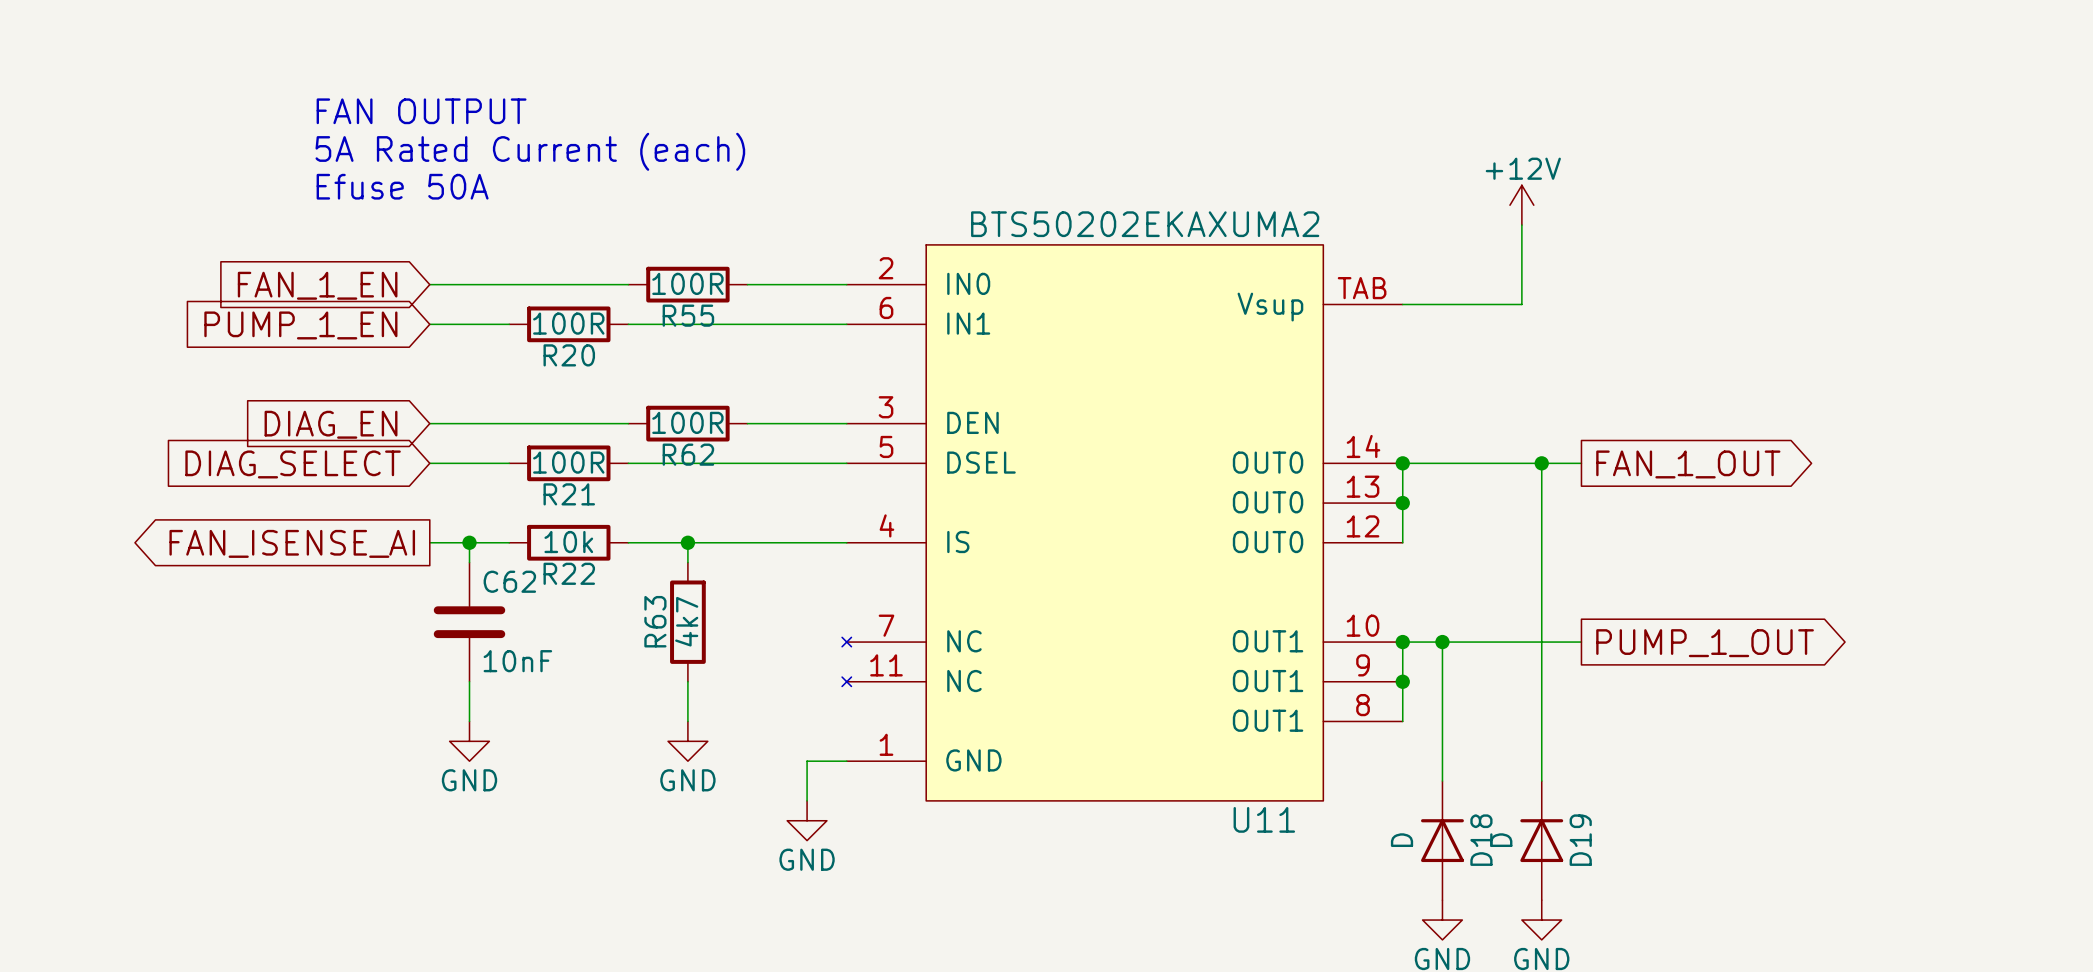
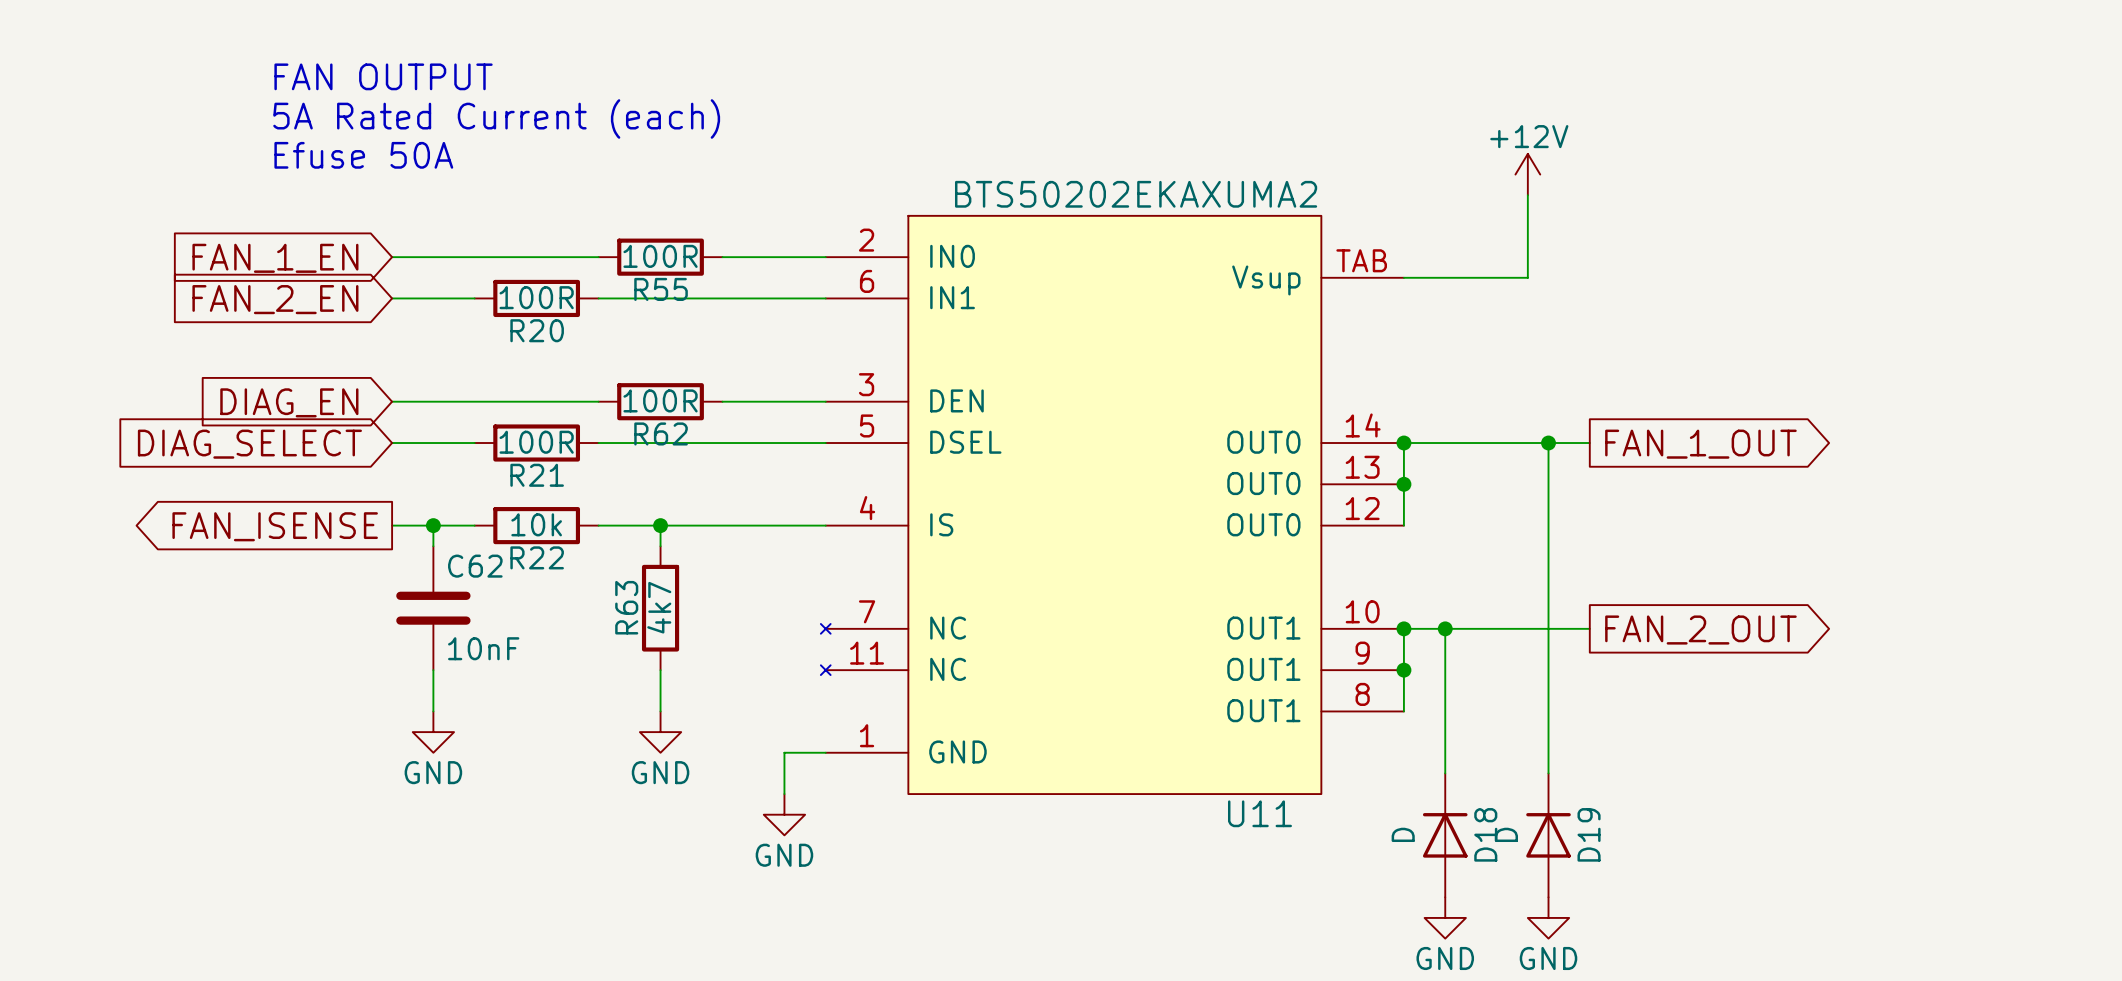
global label: PUMP_1_EN (300, 325) -> FAN_2_EN (275, 299)
global label: FAN_ISENSE_AI (292, 543) -> FAN_ISENSE (275, 526)
global label: PUMP_1_OUT (1705, 643) -> FAN_2_OUT (1700, 630)

